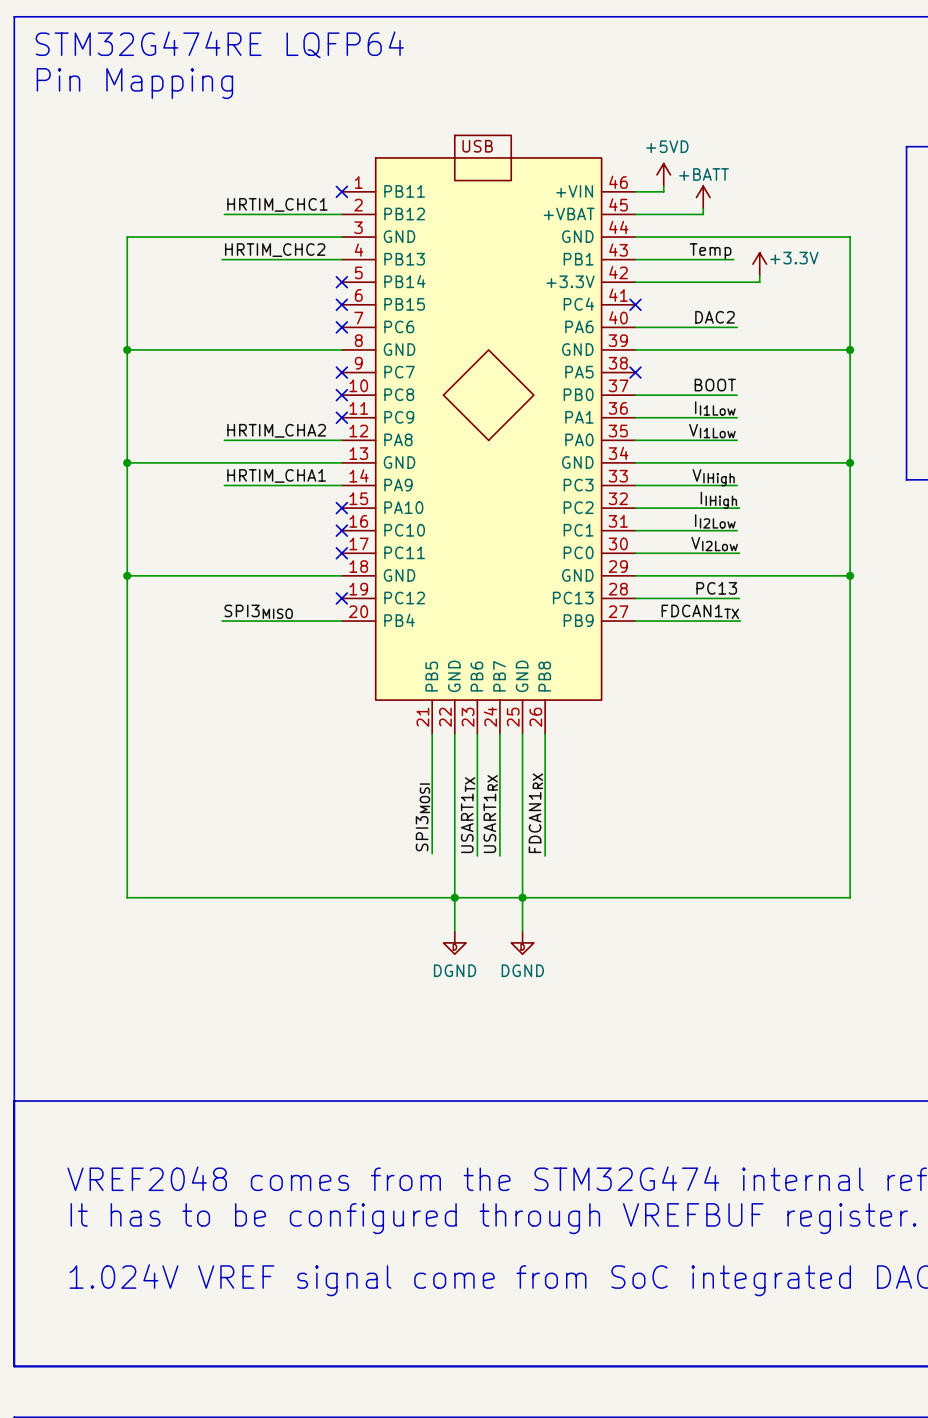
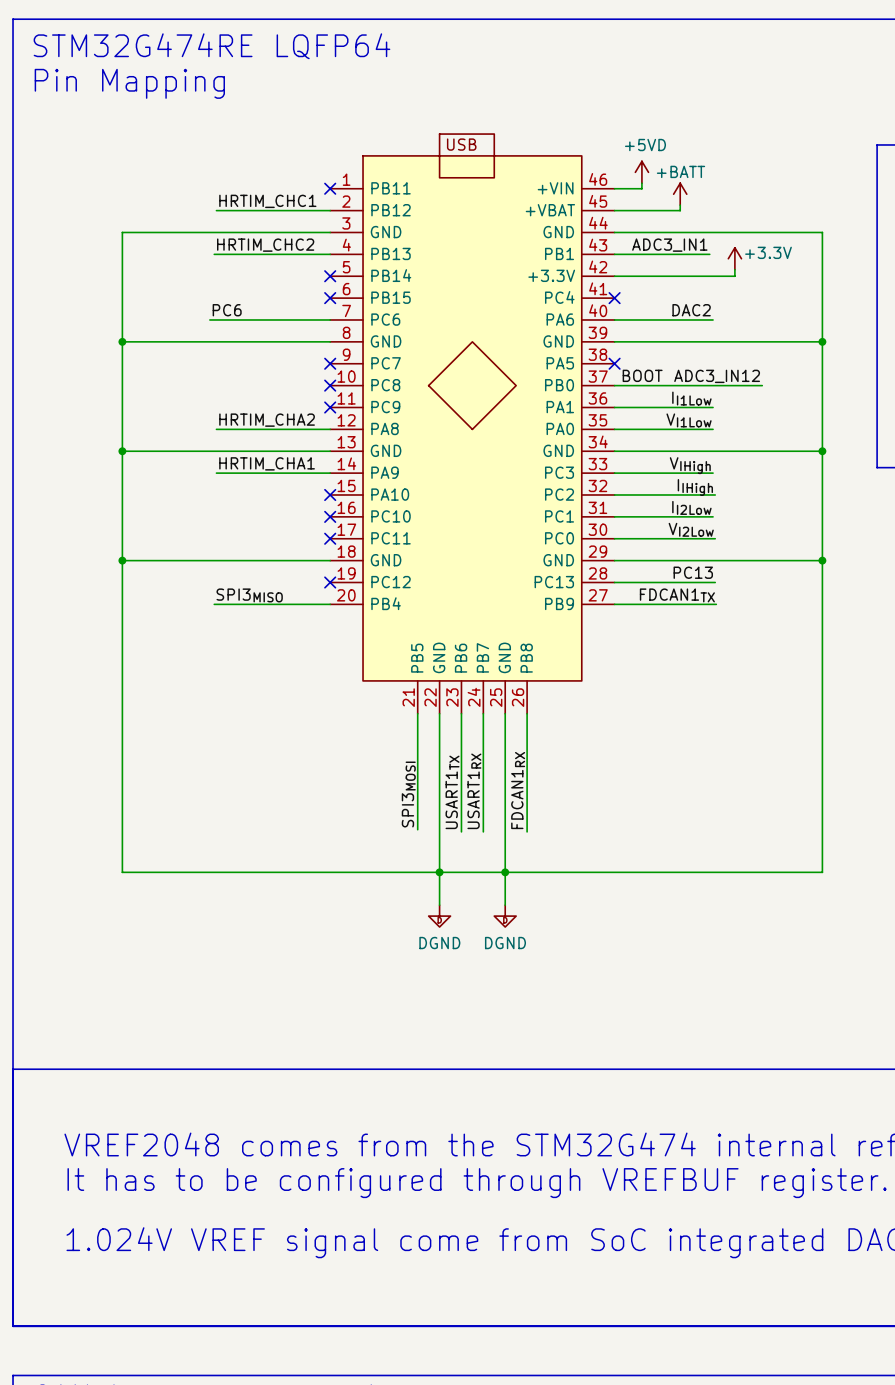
label: Temp (710, 251) -> ADC3_IN1 (669, 245)
label: none -> PC6 (227, 310)
wire: none -> (209, 319) (330, 319)
no-connect mark: (341, 327) -> none
label position: BOOT (715, 385) -> BOOT (642, 375)
label: none -> ADC3_IN12 (717, 376)
wire: none -> (713, 385) (762, 385)

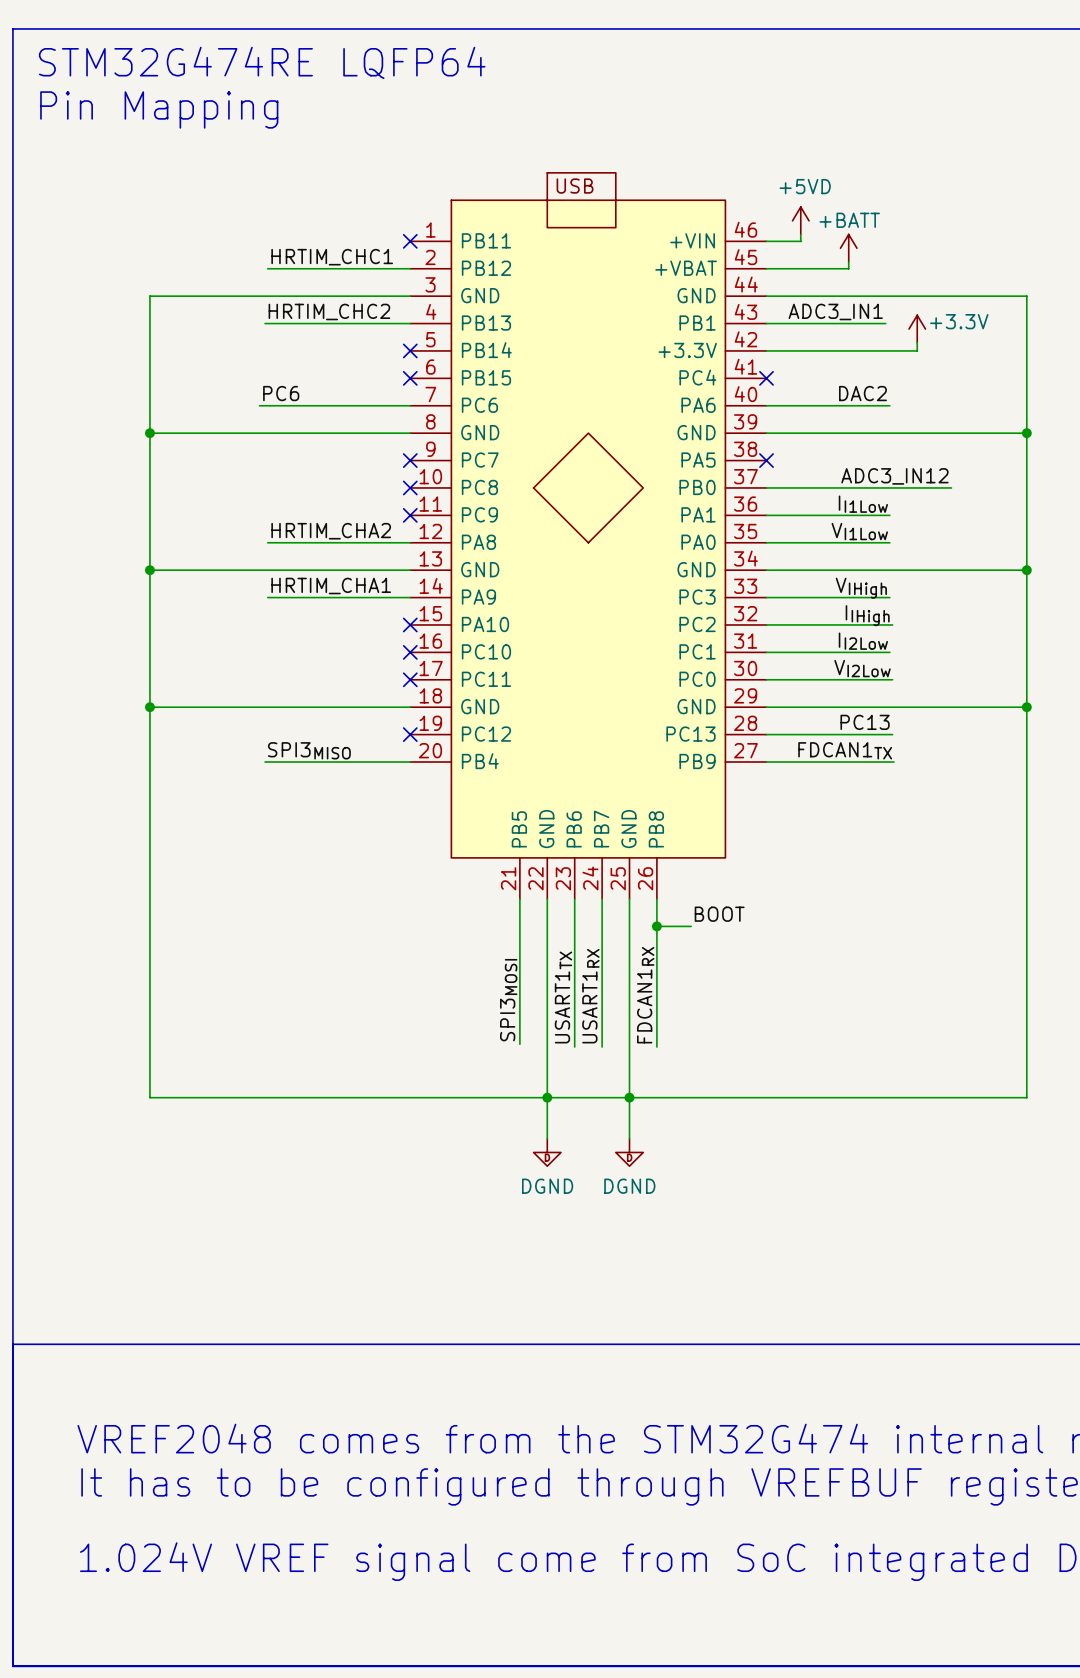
label: BOOT (642, 375) -> none
label: none -> BOOT (719, 914)
wire: none -> (656, 926) (691, 926)
junction: none -> (656, 926)

